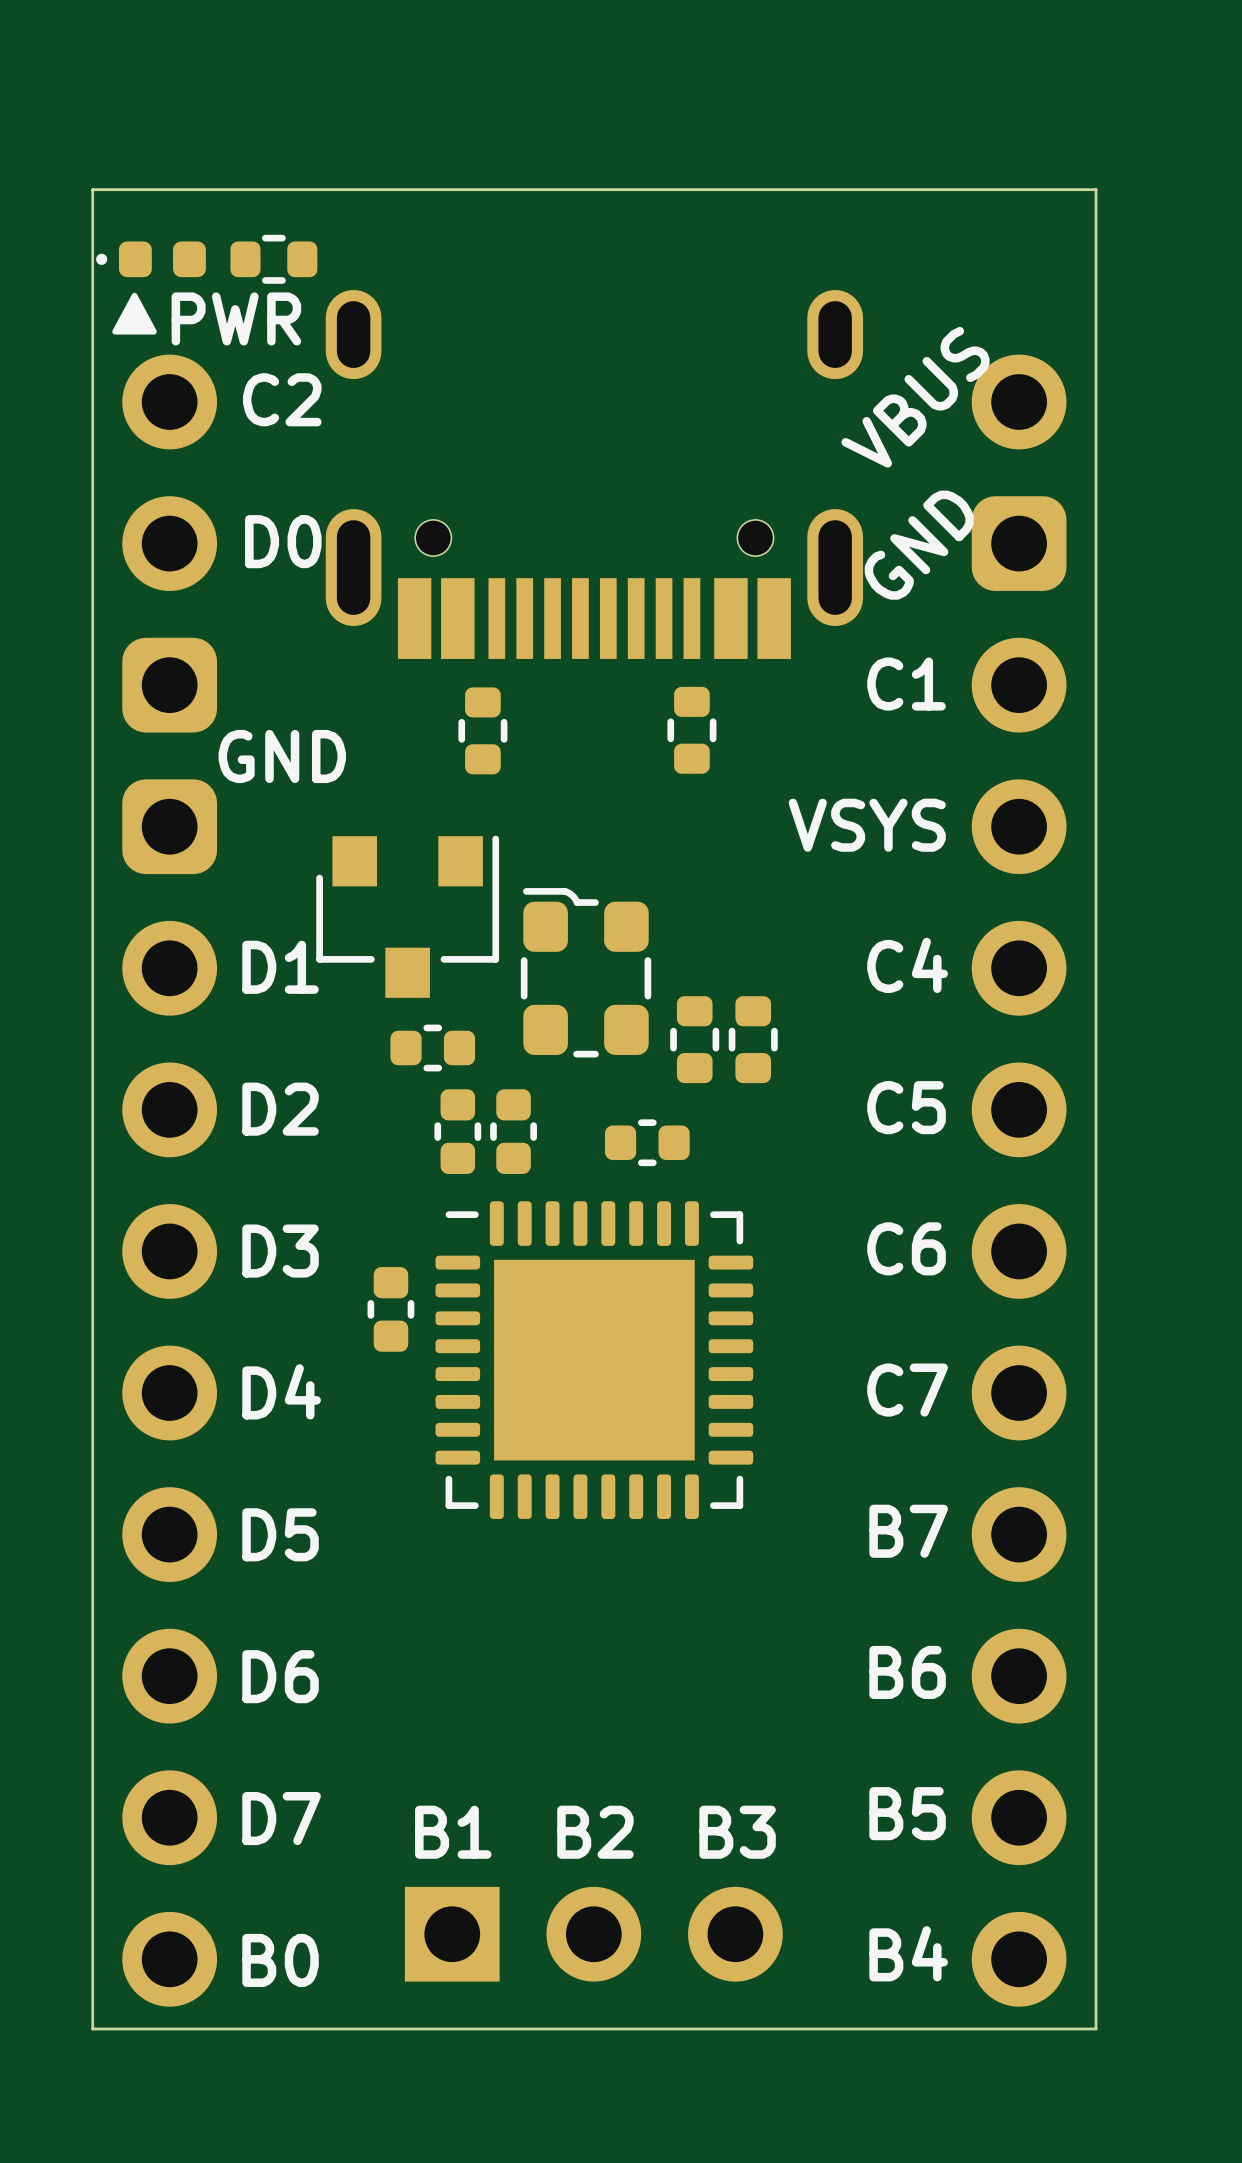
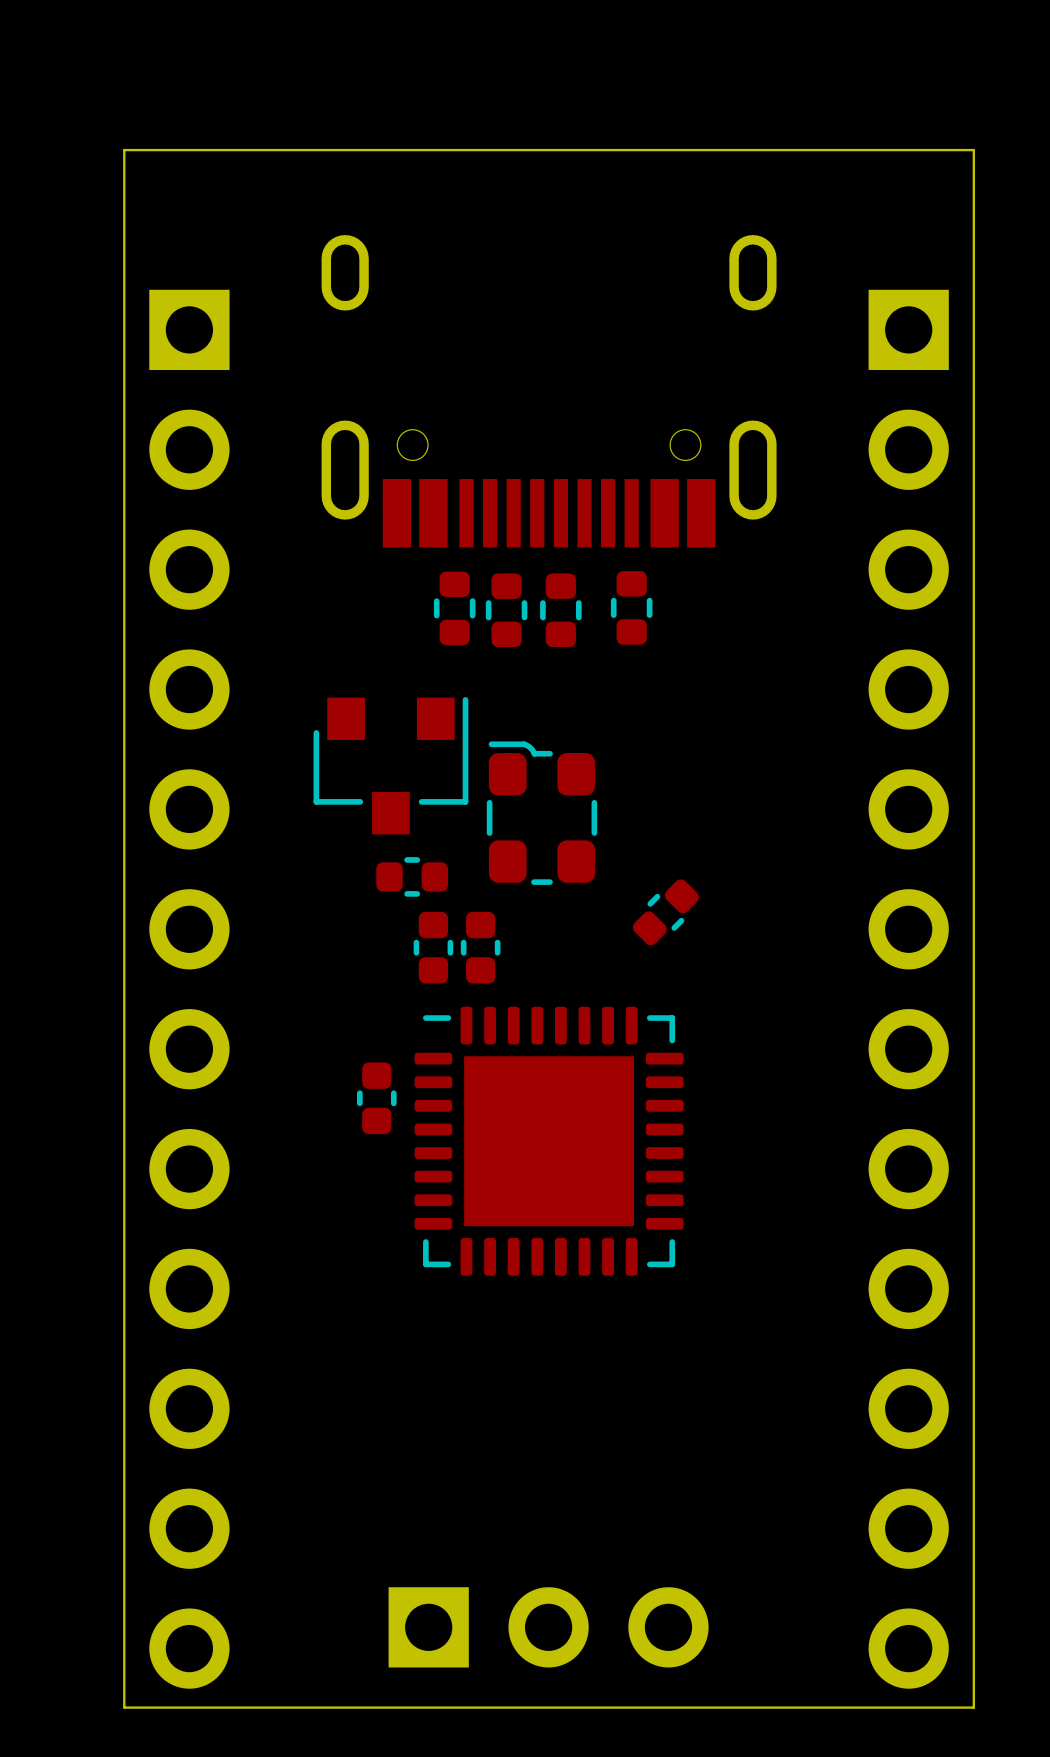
part: (150, 259) -> none
part: (273, 259) -> none
drawing: [112, 292, 157, 335] -> none
text: PWR (236, 318) -> none
part footprint: [122, 354, 218, 2007] -> [149, 289, 230, 1689]
part footprint: [971, 354, 1067, 2007] -> [868, 289, 949, 1689]
text: VBUS (915, 397) -> none
text: C2 (282, 399) -> none
text: D0 (283, 541) -> none
text: GND (919, 545) -> none
text: C1 (906, 684) -> none
part: none -> (506, 610)
part: none -> (560, 610)
text: GND (282, 756) -> none
text: VSYS (867, 825) -> none
text: C4 (907, 965) -> none
text: D1 (280, 967) -> none
part: (694, 1039) -> none
part: (753, 1039) -> none
part: none -> (665, 912)
text: C5 (906, 1107) -> none
text: D2 (280, 1109) -> none
part: (647, 1142) -> none
text: C6 (906, 1248) -> none
text: D3 (280, 1251) -> none
text: C7 (907, 1390) -> none
text: D4 (281, 1391) -> none
text: B7 (908, 1531) -> none
text: D5 (280, 1534) -> none
text: B6 (907, 1672) -> none
text: D6 (280, 1676) -> none
text: B5 (907, 1813) -> none
text: D7 (281, 1818) -> none
text: B1 (453, 1832) -> none
text: B2 (595, 1832) -> none
text: B3 (737, 1832) -> none
text: B4 (908, 1953) -> none
text: B0 (280, 1960) -> none

